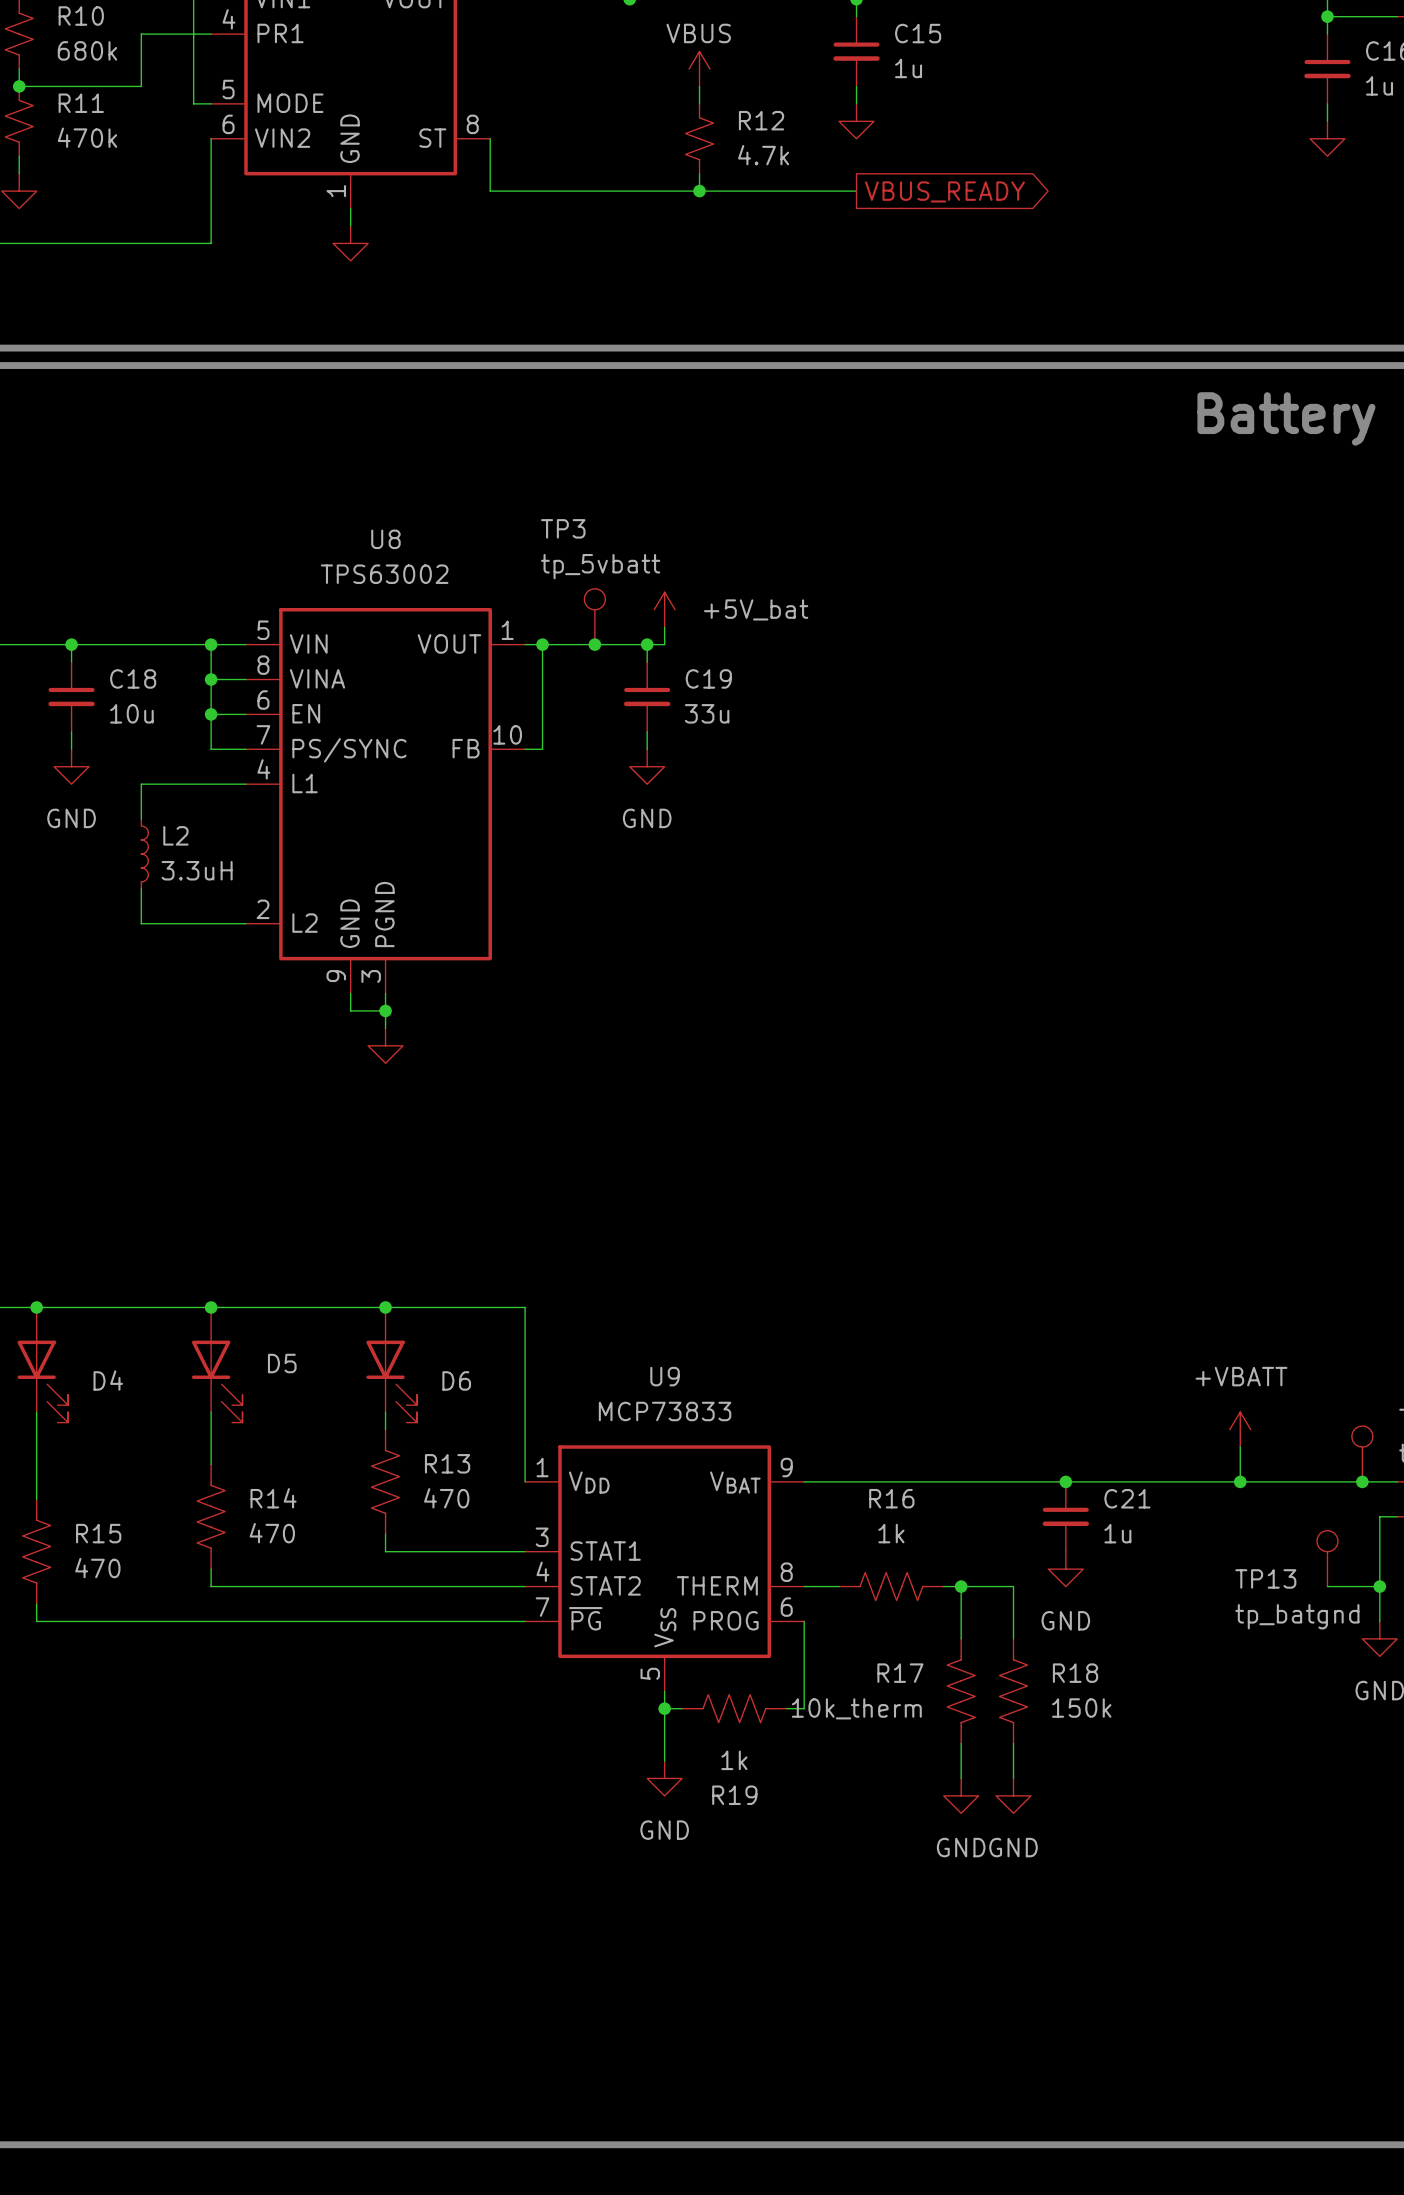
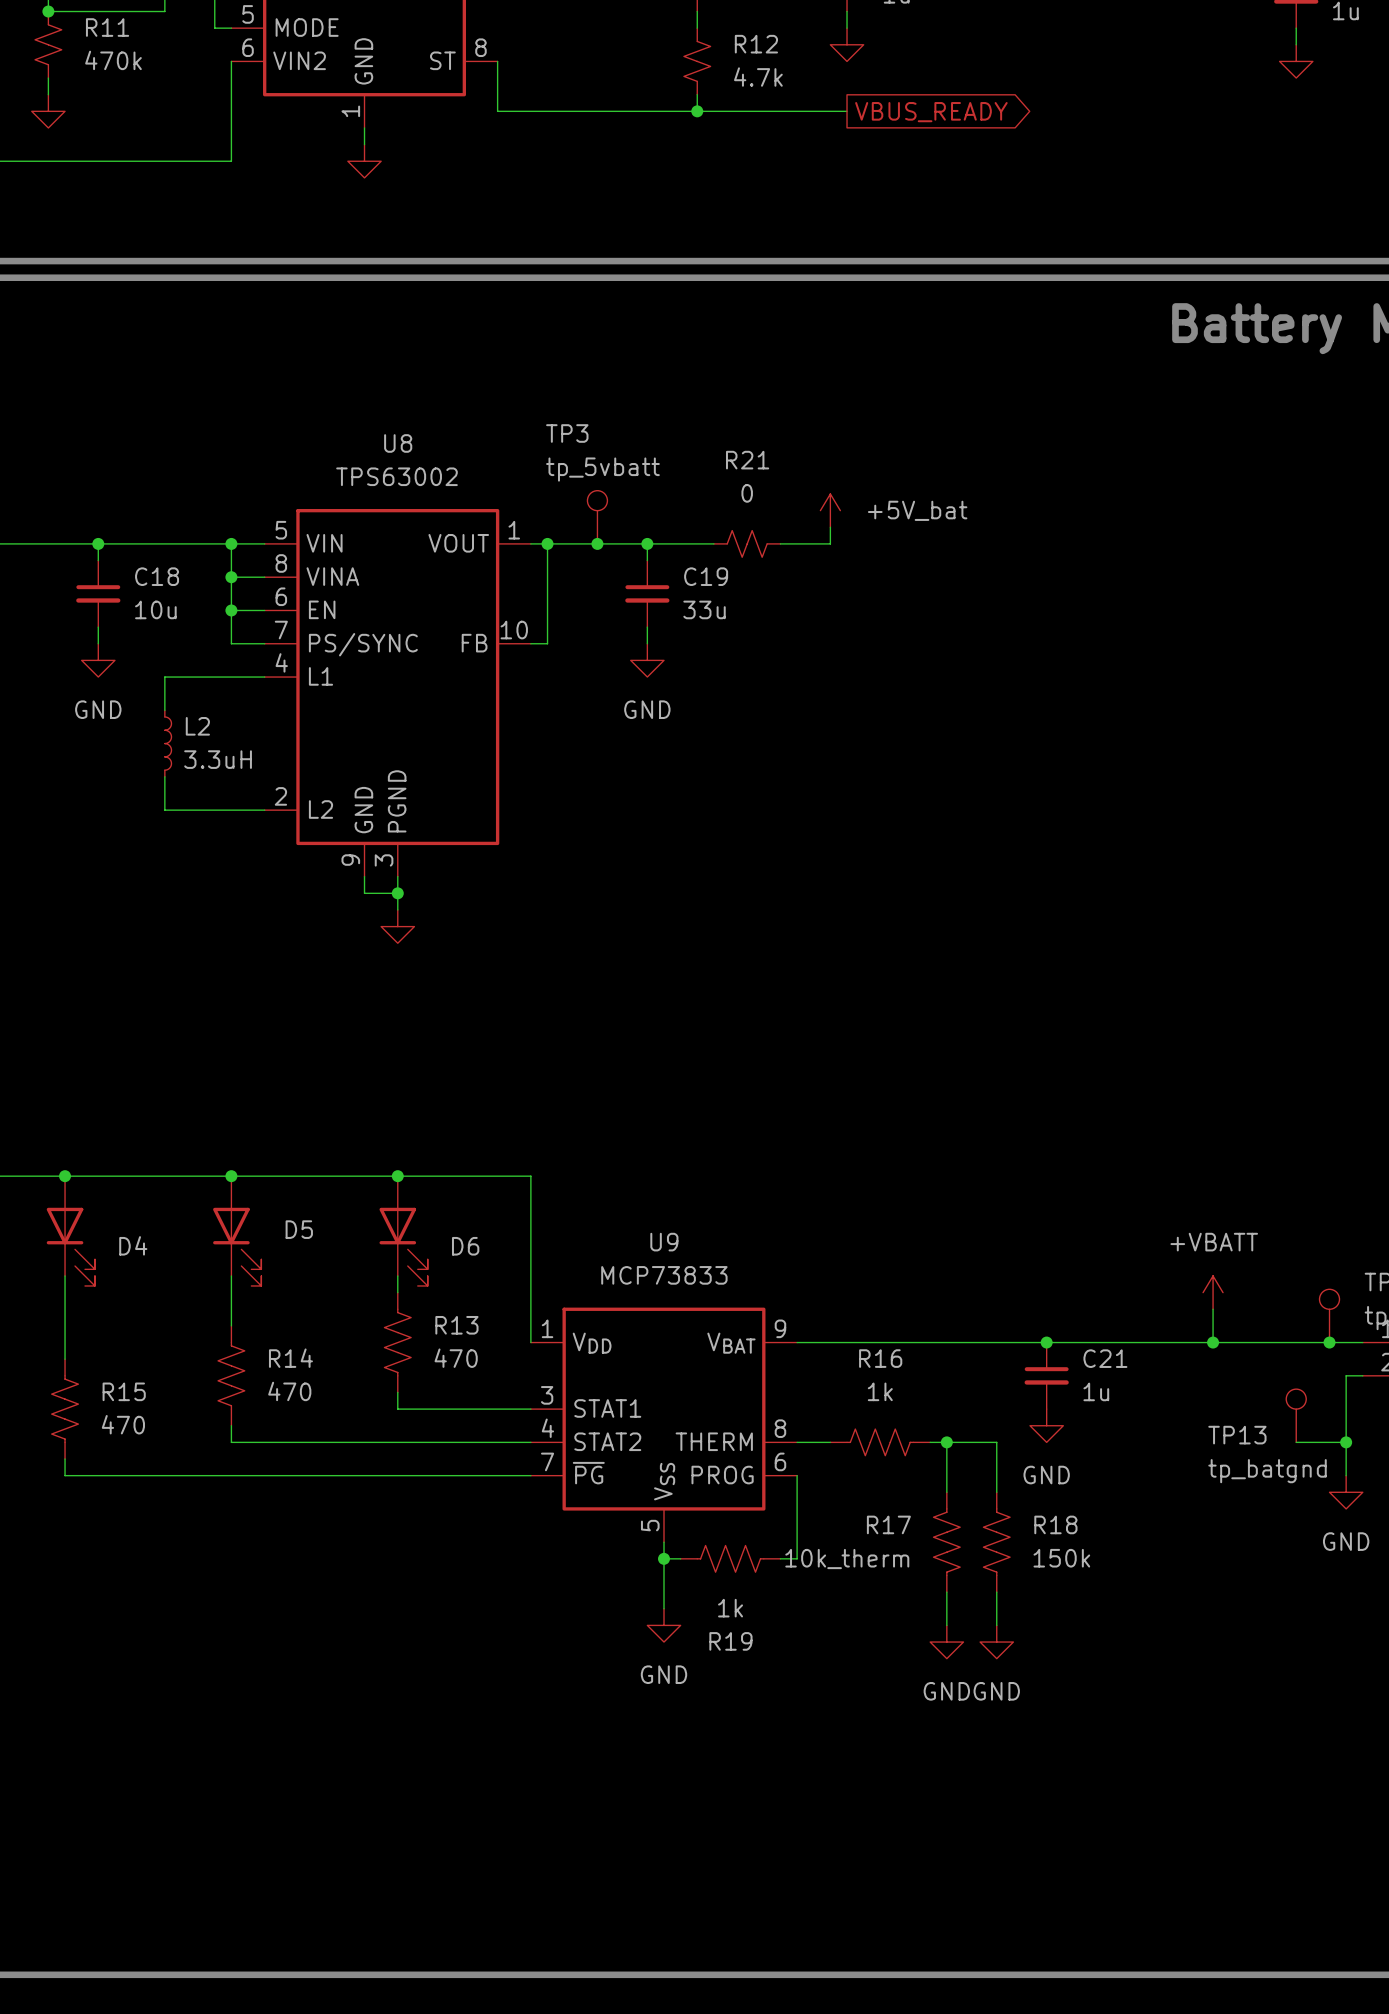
power symbol position: +5V_bat (664, 609) -> +5V_bat (830, 510)
wire: (664, 627) (664, 644) -> (713, 543) (663, 543)
wire: none -> (830, 527) (830, 543) (780, 543)
R21: none -> 0 (747, 543)

